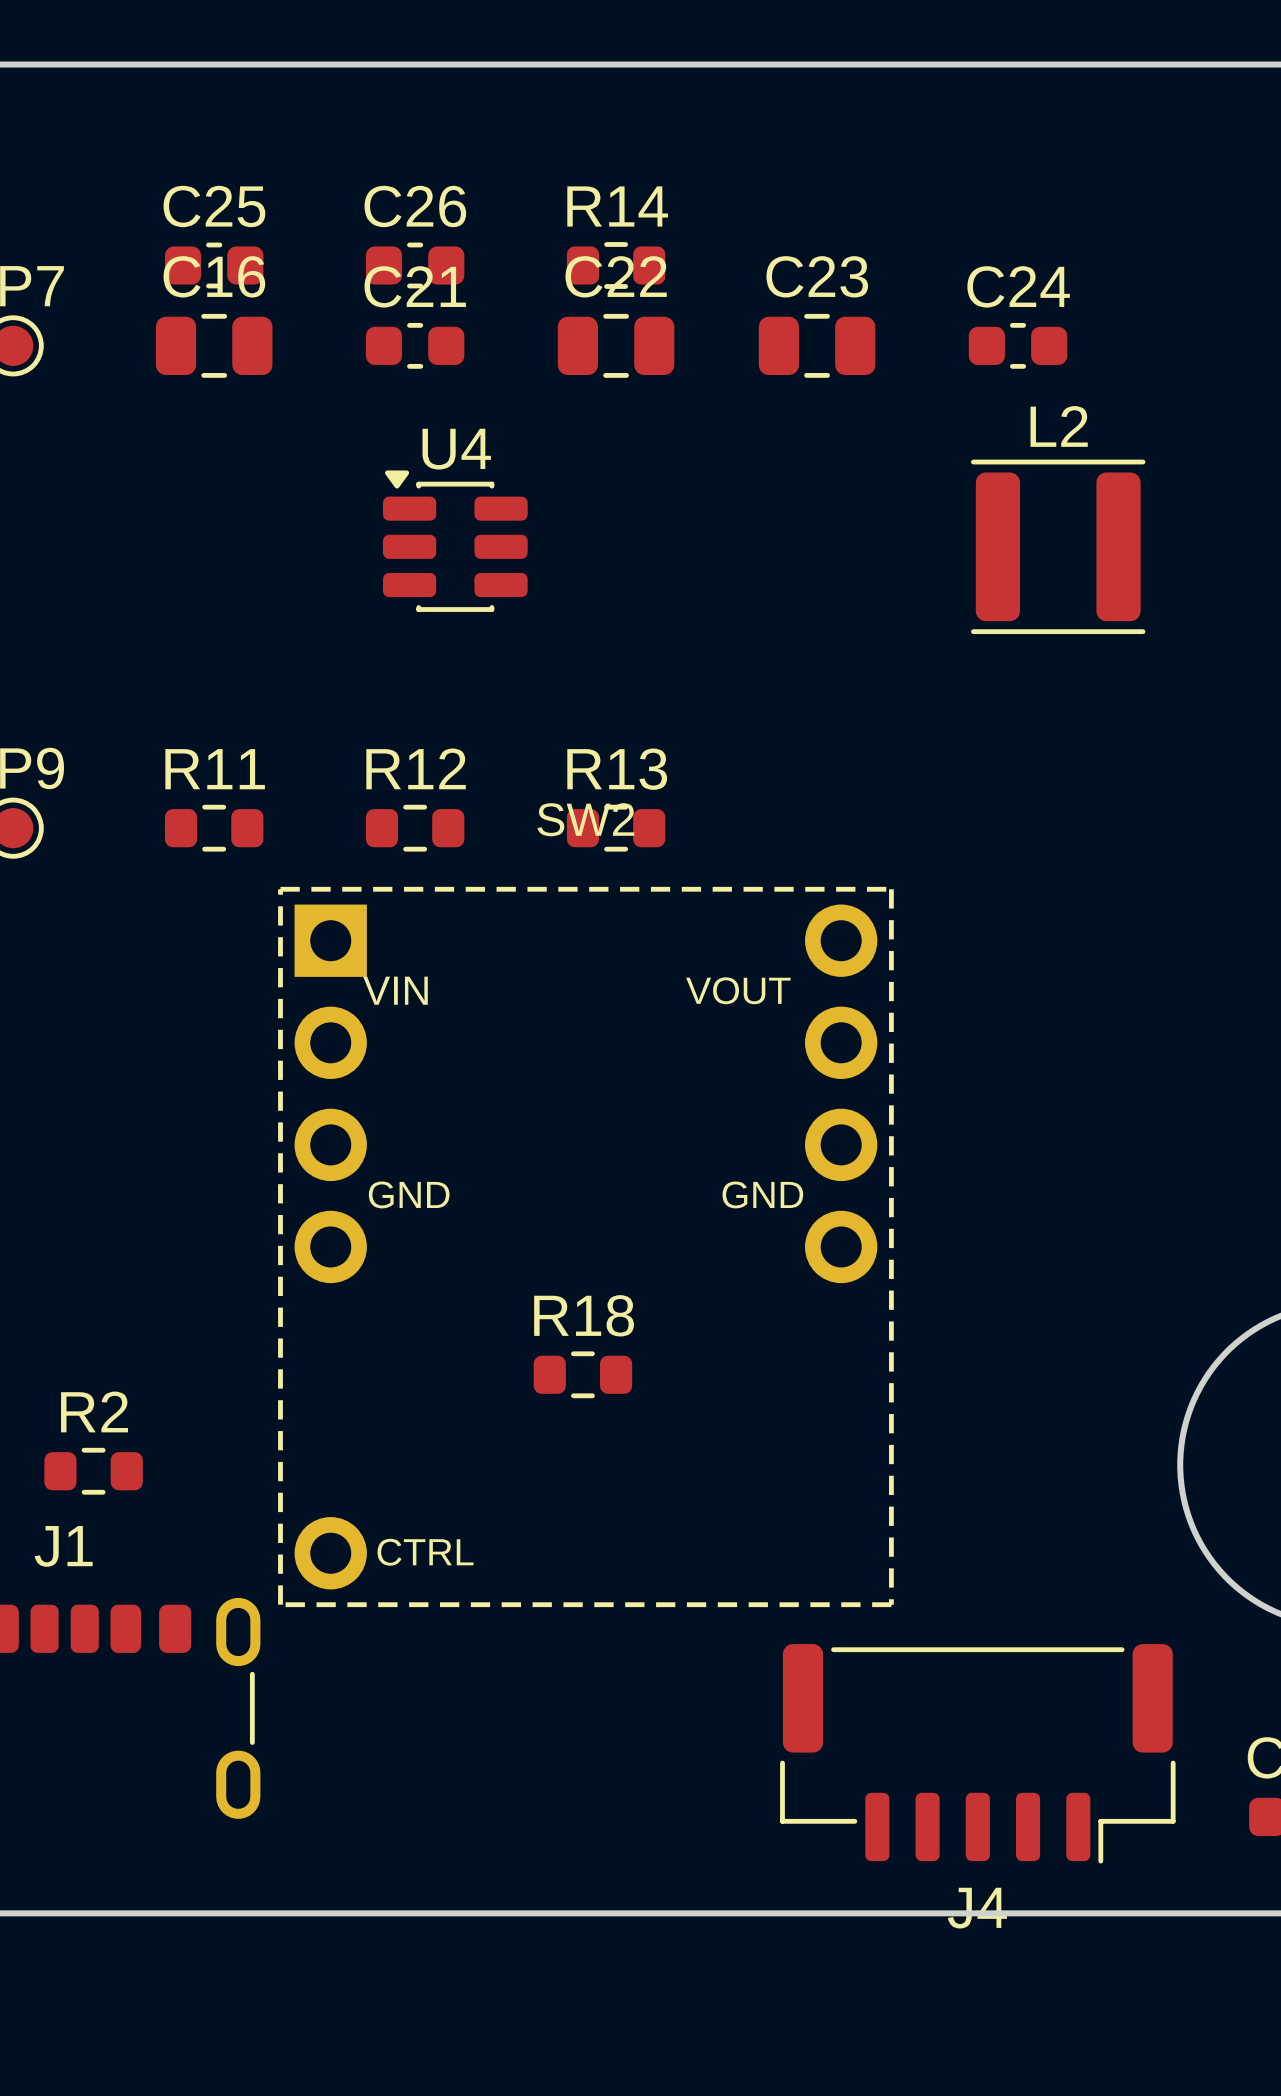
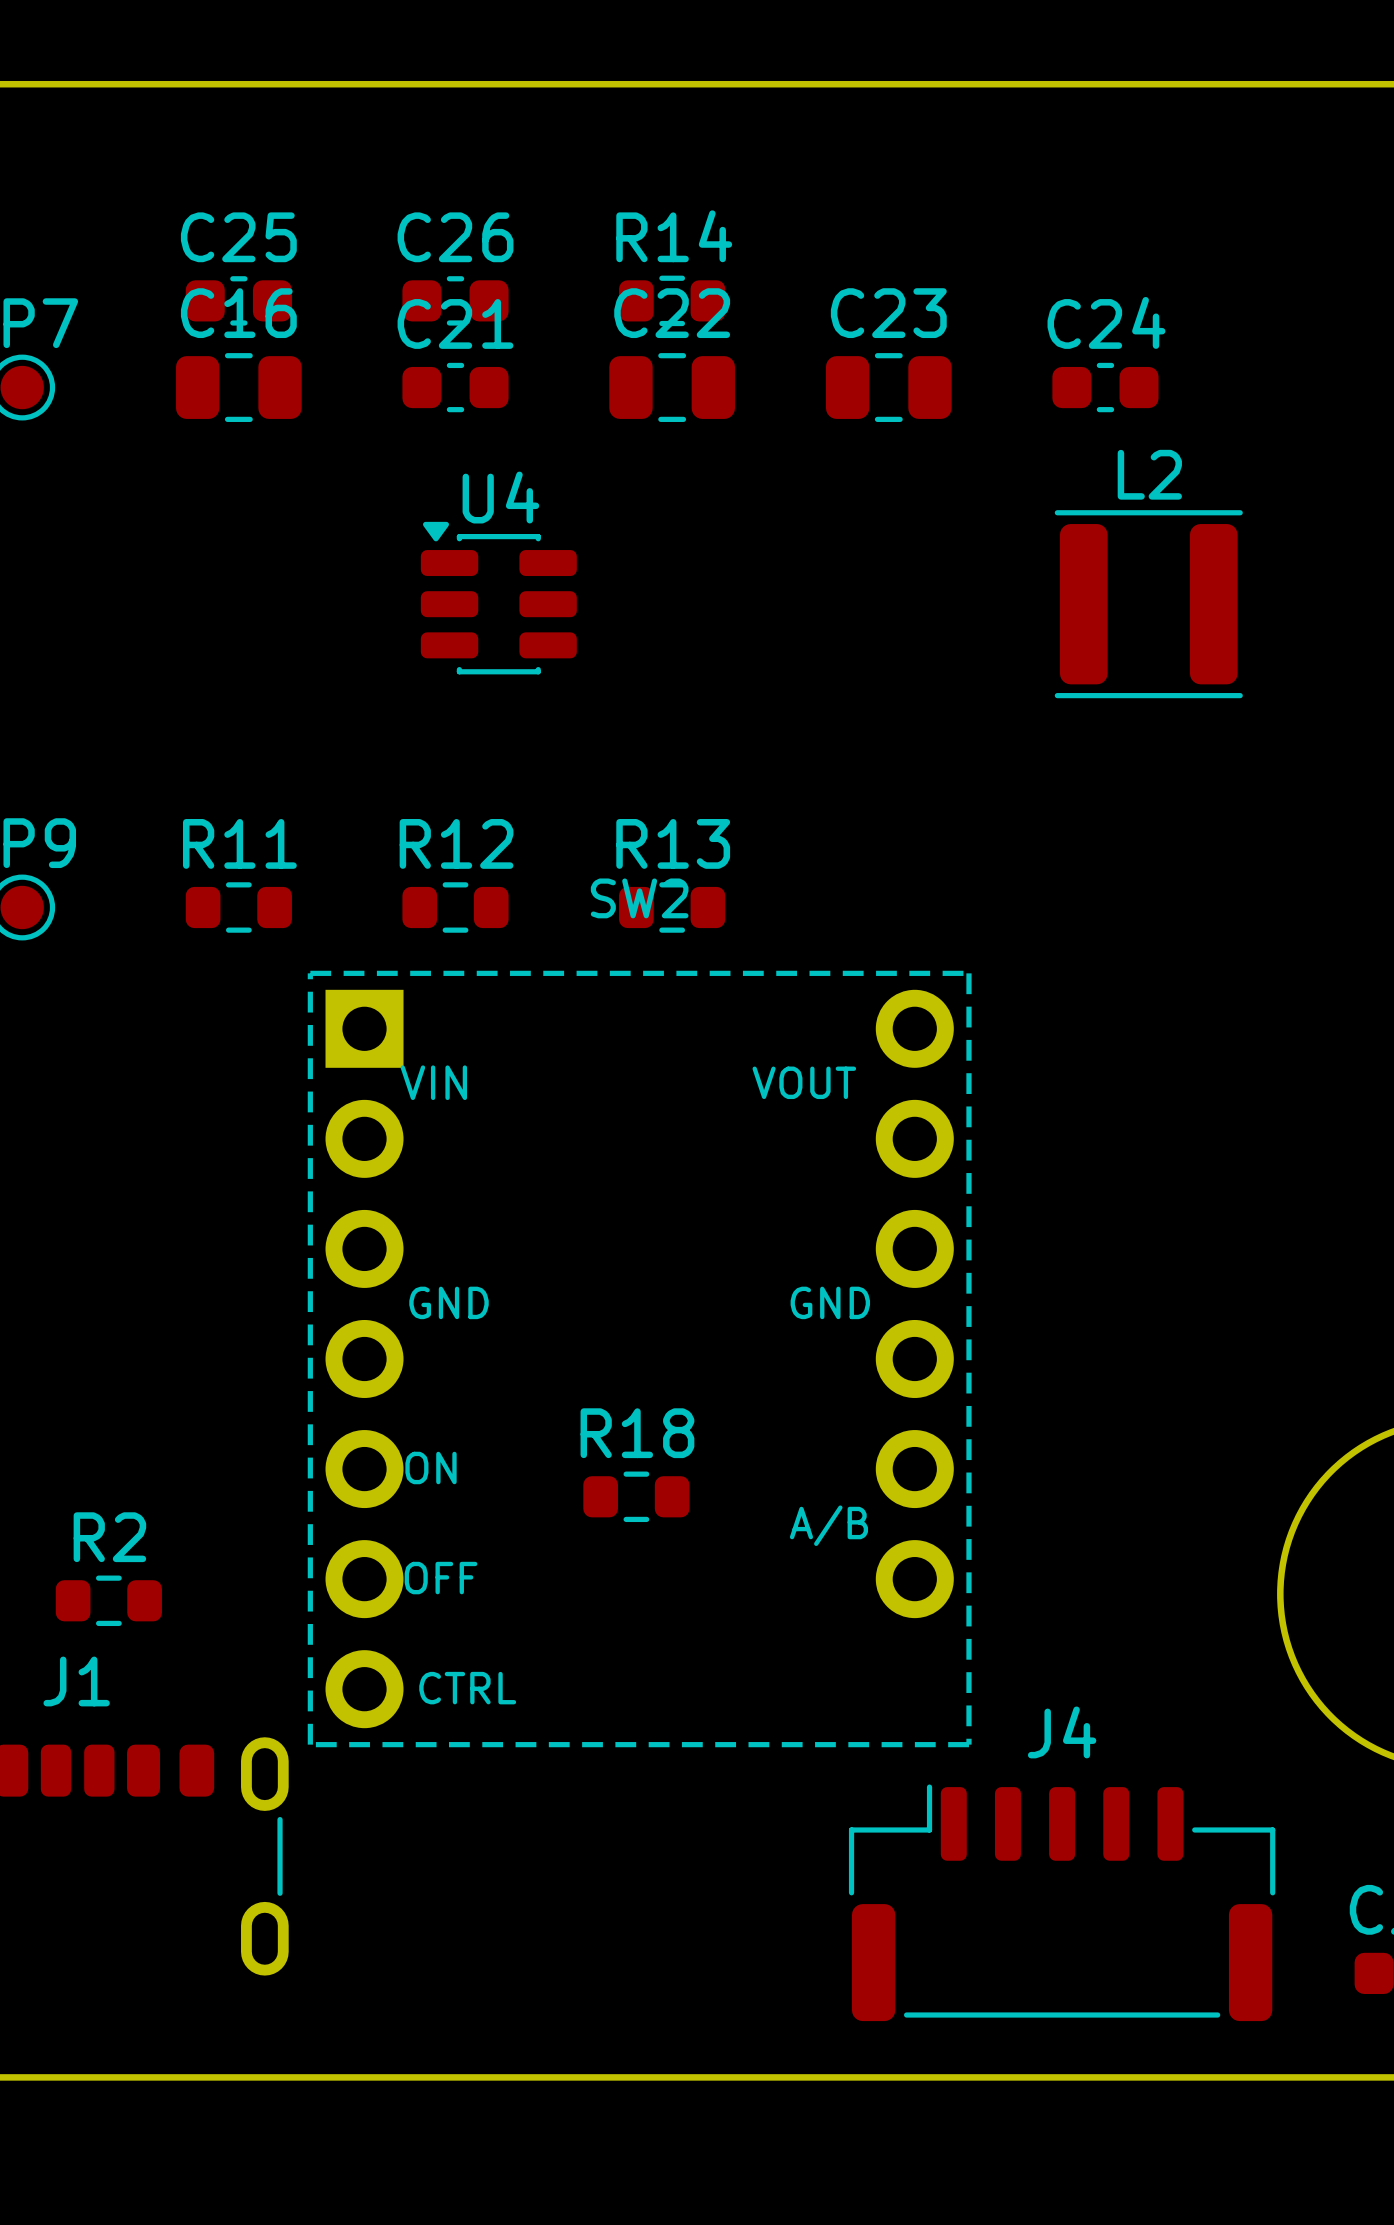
SW2 footprint: [278, 886, 894, 1608] -> [307, 970, 972, 1748]
J4 rotation: 0° (977, 1753) -> 180° (1062, 1902)

